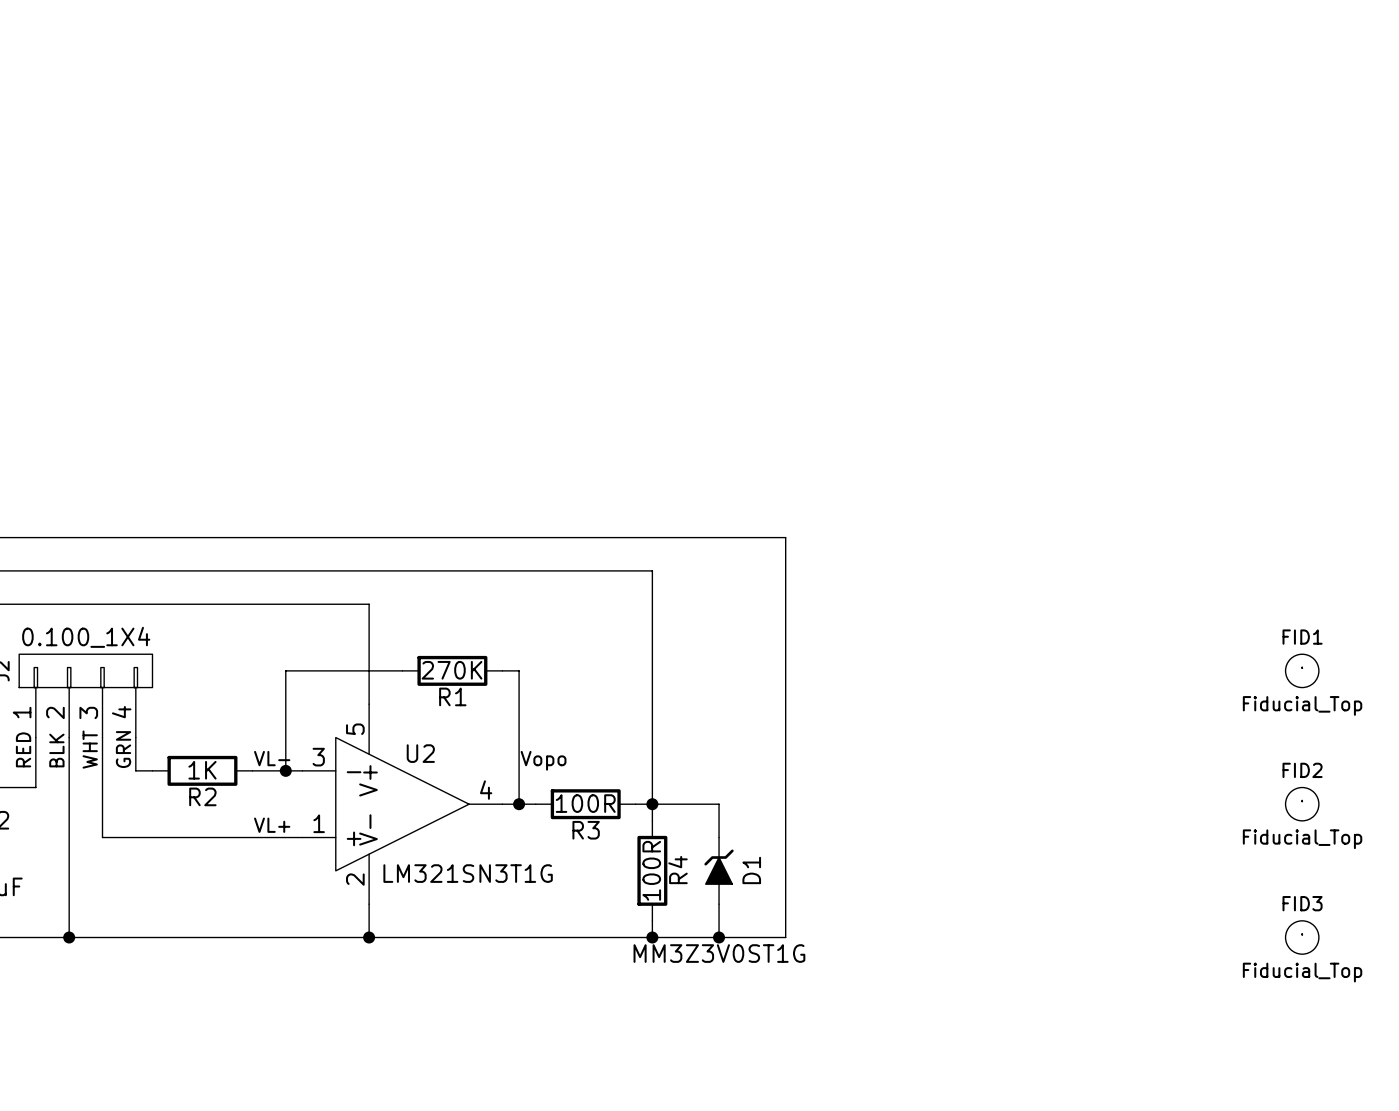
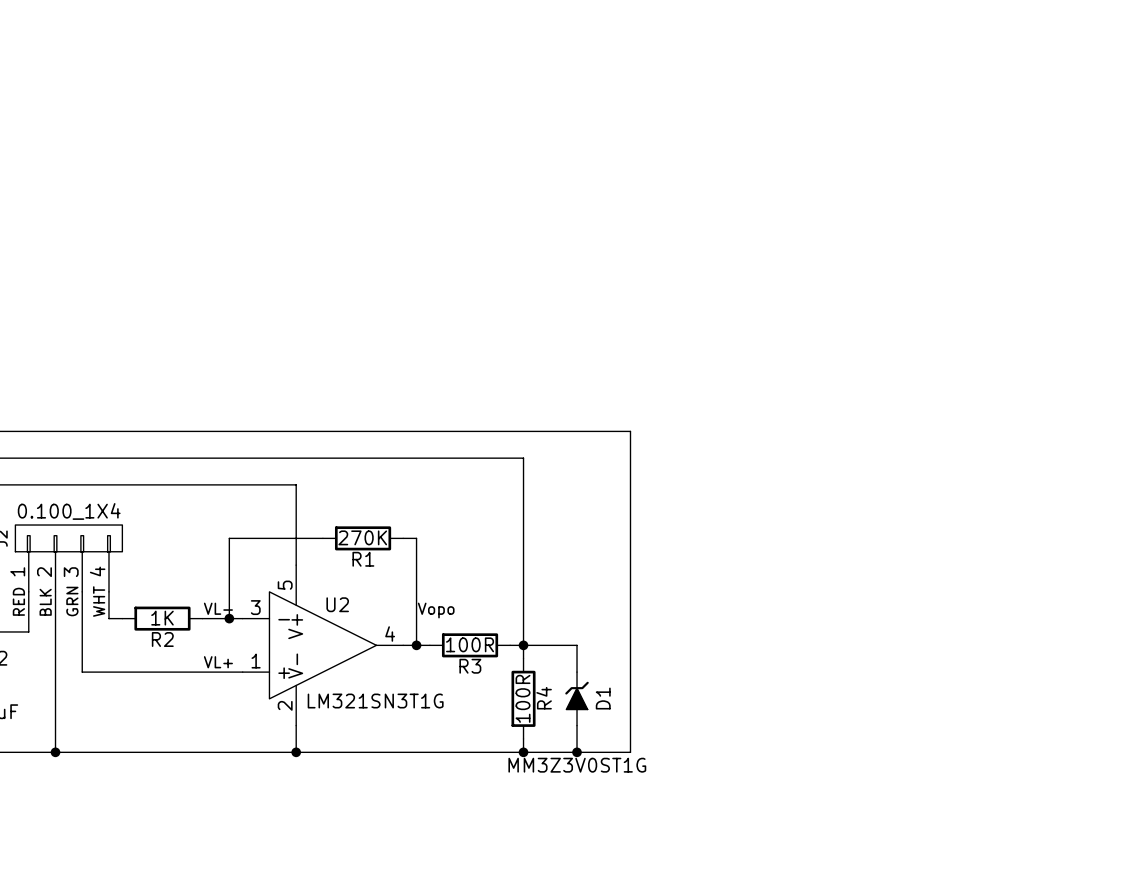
FID1: Fiducial_Top (1302, 670) -> none
label: WHT (90, 749) -> GRN (72, 601)
label: GRN (123, 749) -> WHT (99, 601)
FID2: Fiducial_Top (1302, 804) -> none
FID3: Fiducial_Top (1302, 937) -> none

